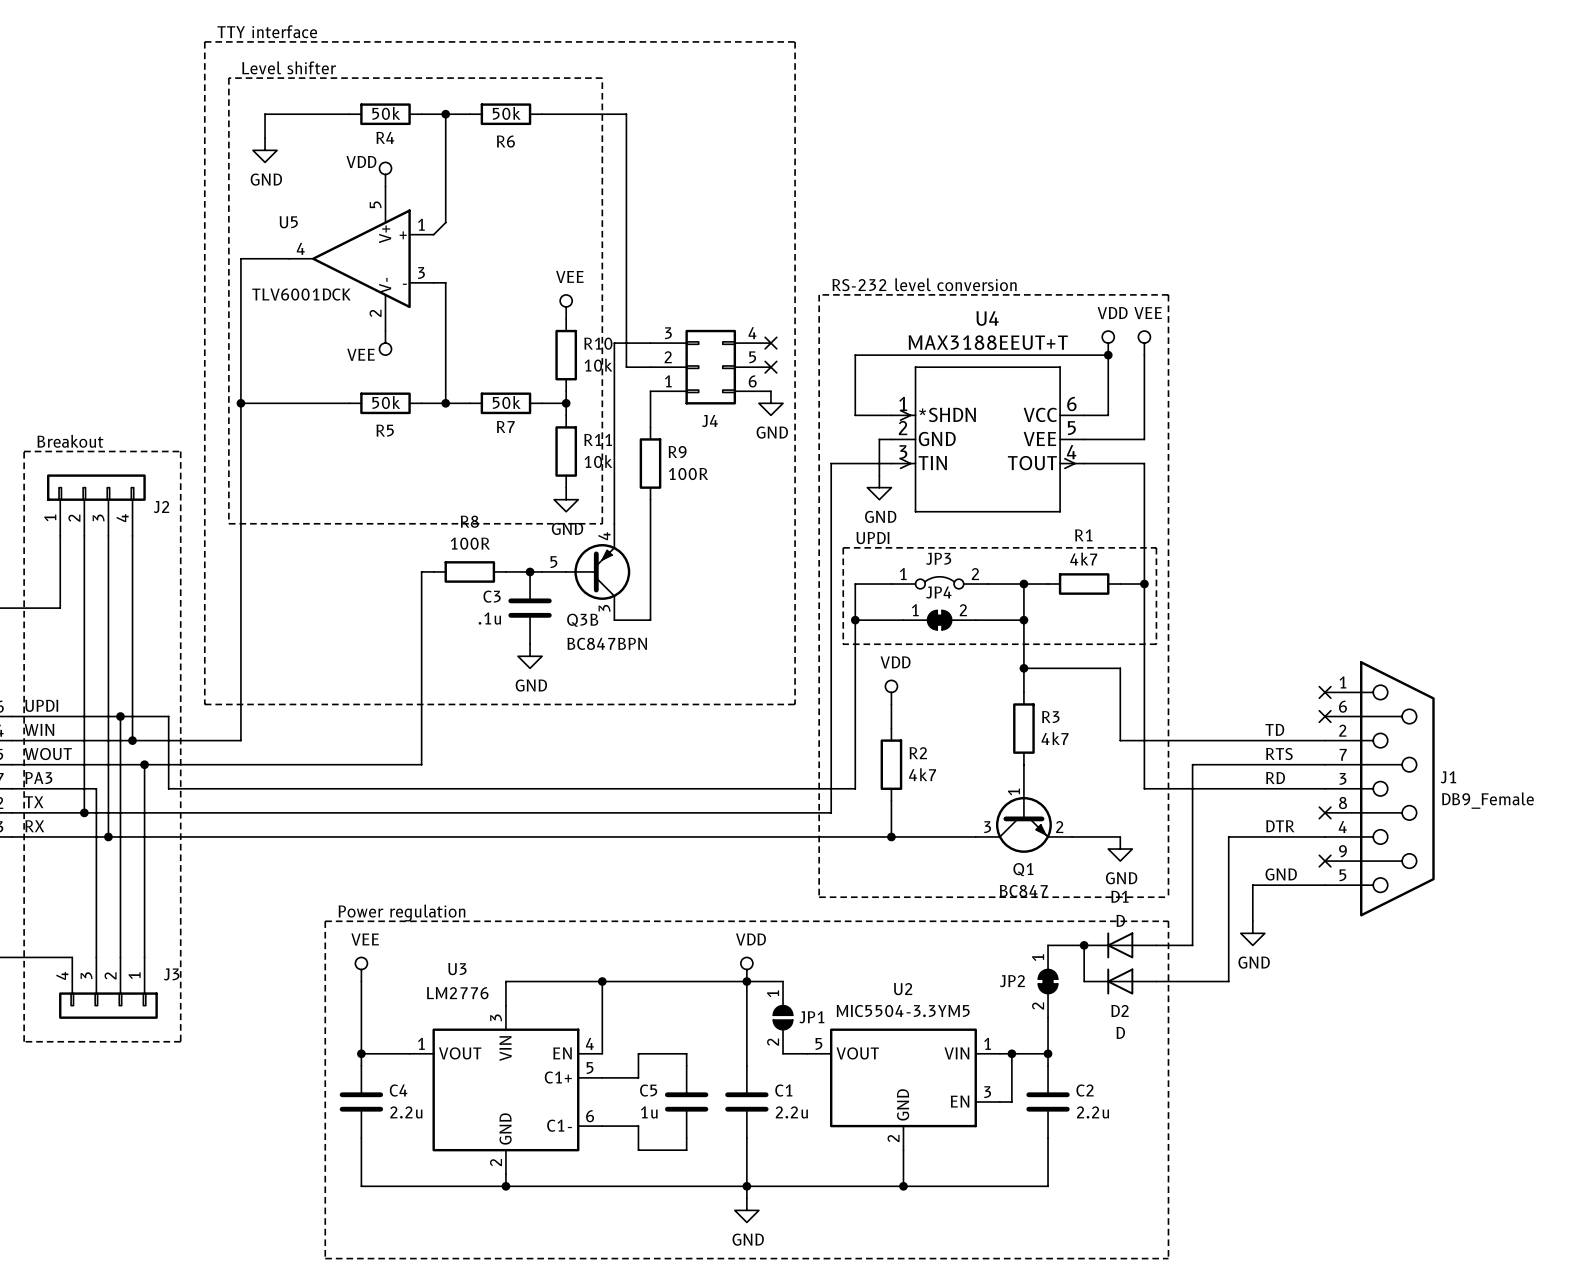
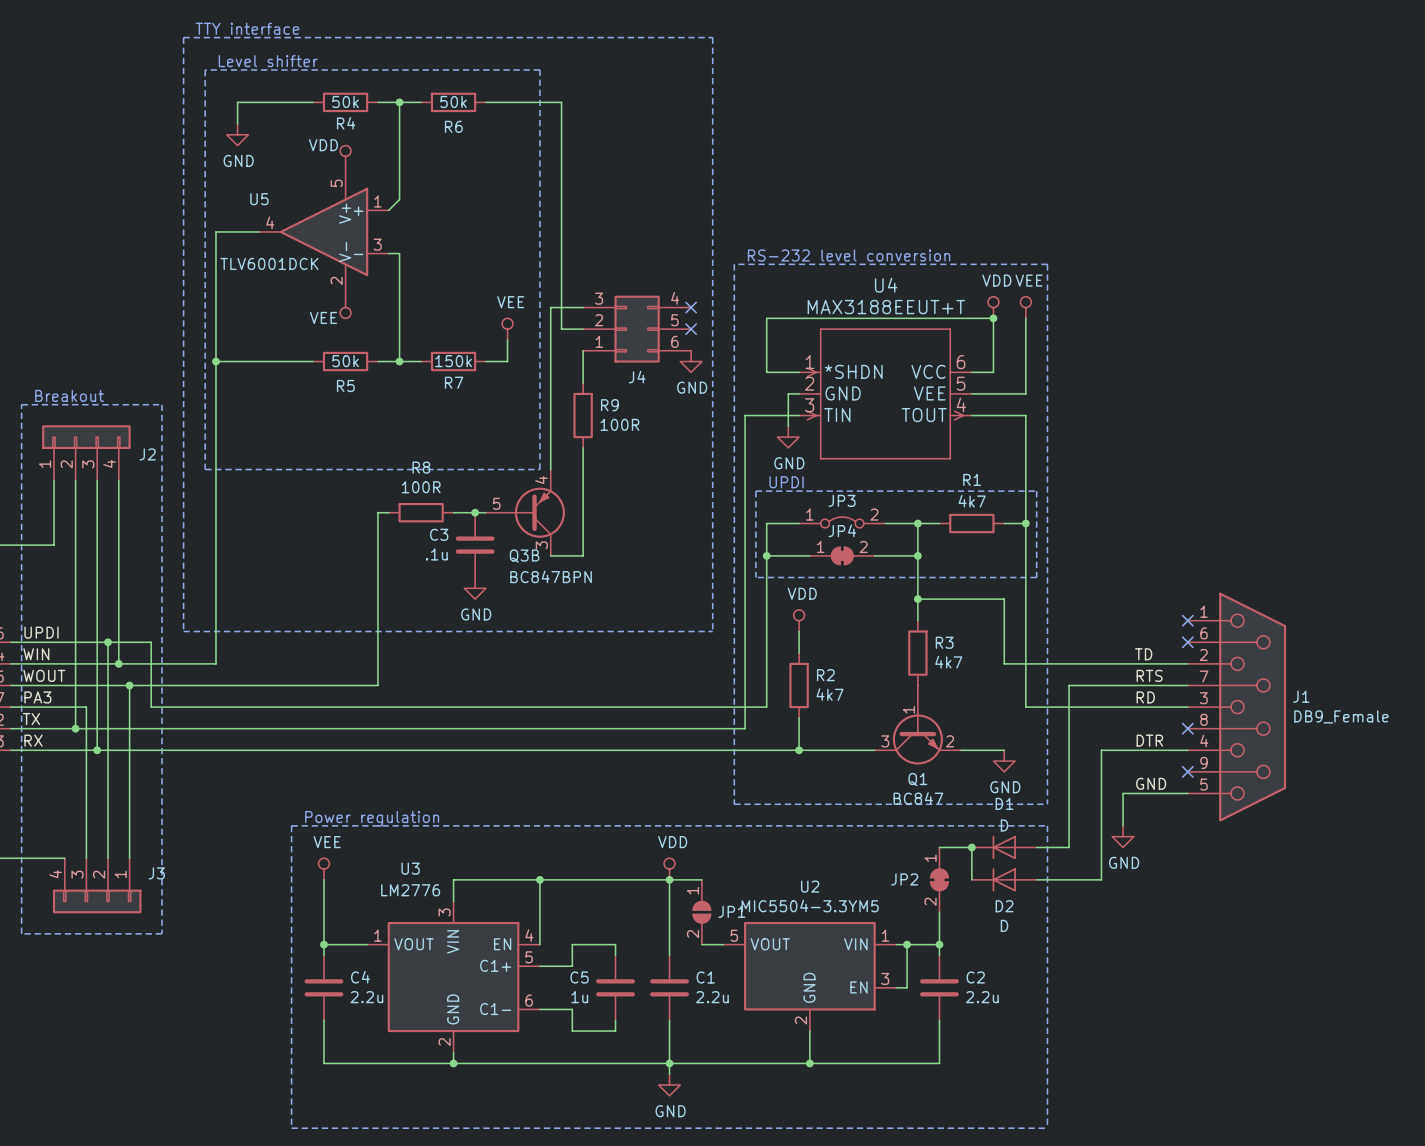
power symbol position: VEE (566, 306) -> VEE (507, 329)
R10: 10k (566, 355) -> none
R7 value: 50k (506, 402) -> 150k (453, 361)
junction: (566, 403) -> none
R11: 10k (566, 451) -> none
power symbol: GND (566, 499) -> none

